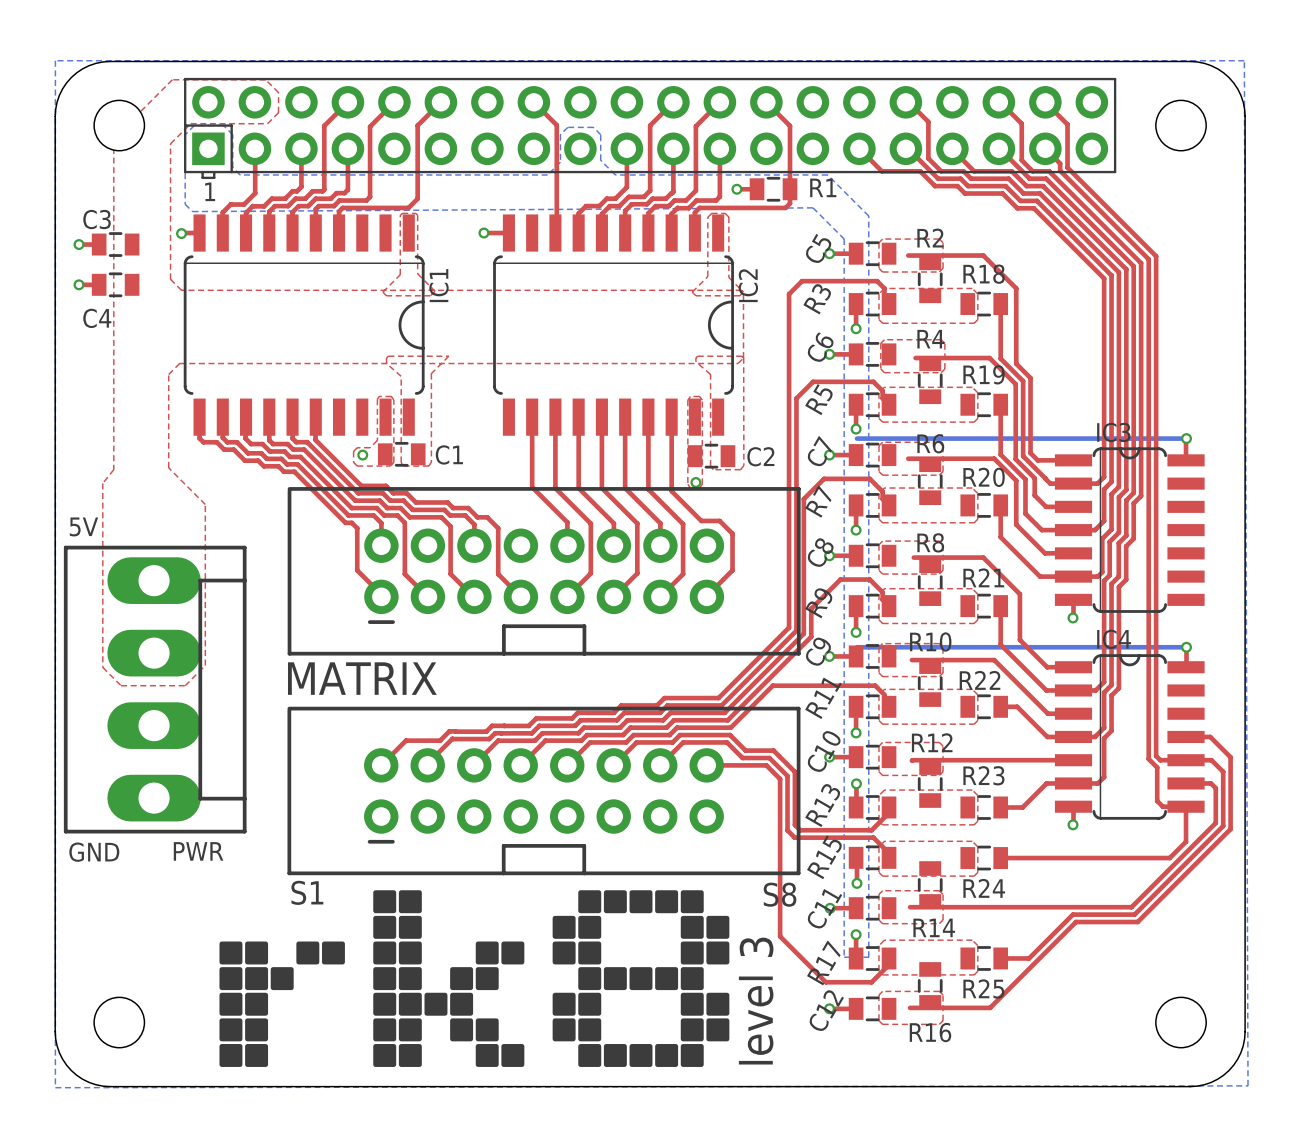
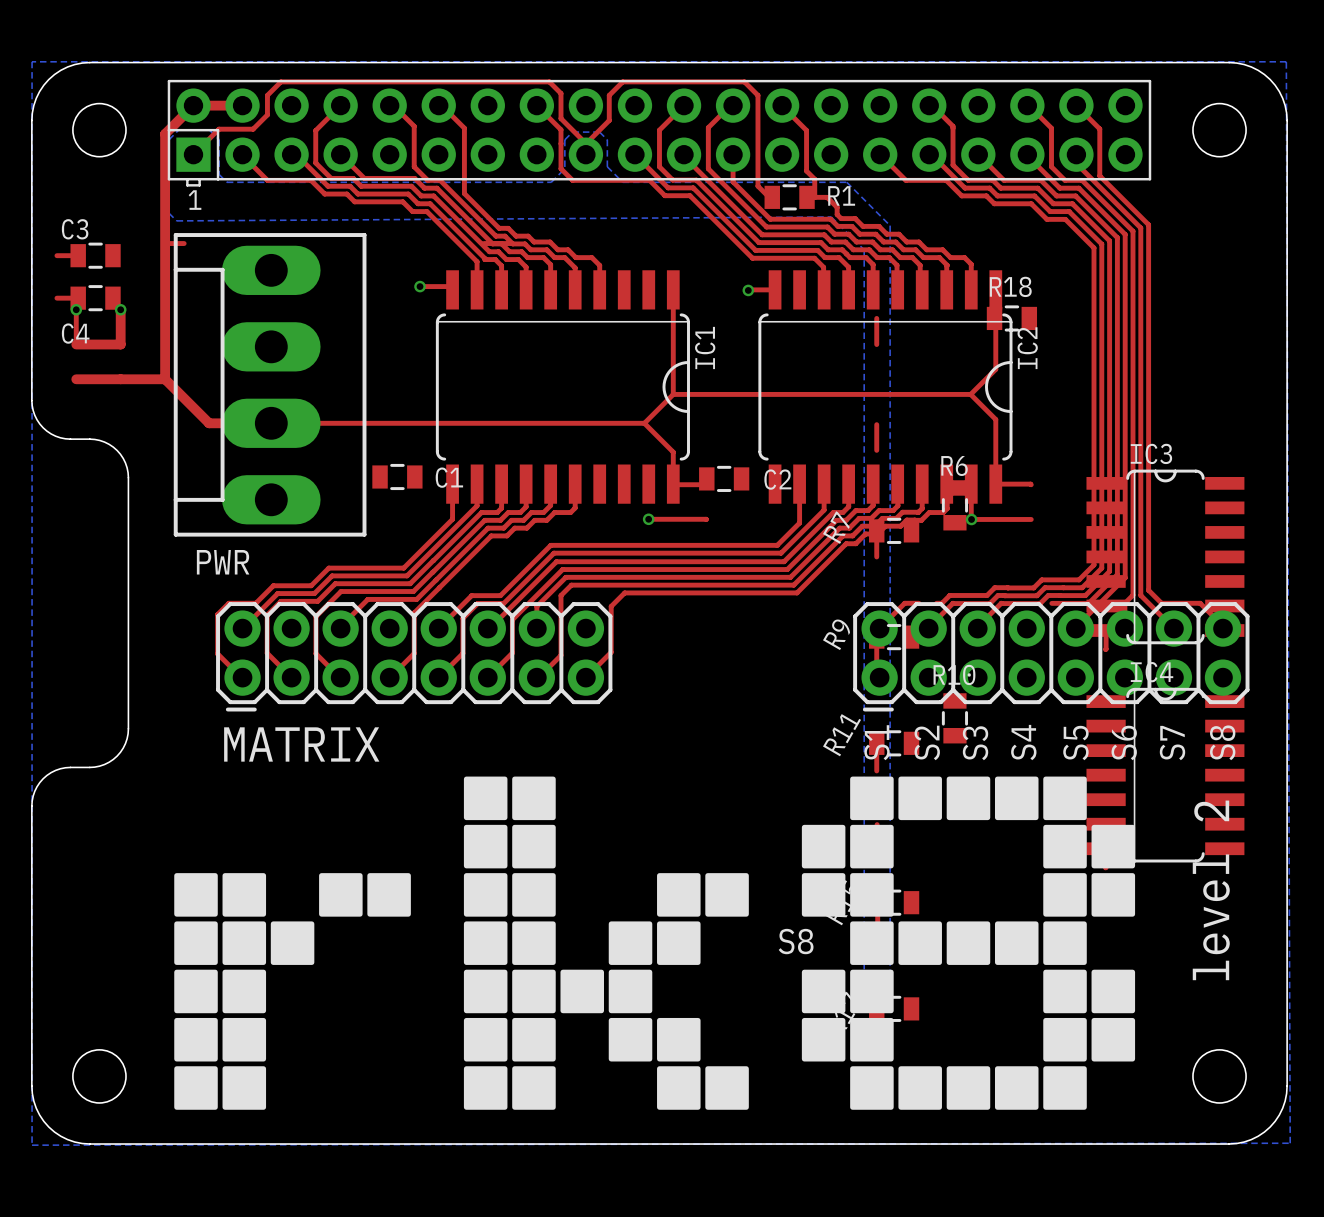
part footprint: [55, 61, 1246, 1087] -> [31, 62, 1288, 1145]
top zone outline: (172, 79) (265, 79) (278, 92) (278, 112) (267, 123) (190, 123) (170, 143) (170, 279) (181, 290) (741, 290) (741, 293) (739, 295) (695, 295) (692, 292) (707, 276) (707, 217) (711, 213) (725, 213) (728, 217) (728, 277) (743, 292) (743, 358) (738, 363) (179, 363) (168, 374) (168, 467) (205, 504) (205, 665) (185, 685) (121, 685) (102, 667) (102, 483) (113, 469) (113, 138) (172, 79) -> none
top track: none -> (242, 105) (193, 105) (165, 134) (165, 379)
top track: (394, 102) (370, 126) (370, 196) (366, 200) (339, 200) (333, 206) (318, 206) (315, 209) (315, 233) -> none
top track: (440, 102) (417, 125) -> (389, 105) (393, 105) (414, 126) (414, 130)
top track: none -> (438, 105) (441, 105) (464, 128) (464, 193) (499, 228) (508, 228) (516, 236) (528, 236) (534, 242) (550, 242) (557, 249) (568, 249) (575, 257) (591, 257) (599, 265) (599, 289)
top track: (719, 102) (695, 126) (695, 190) (686, 200) (674, 200) (668, 206) (655, 206) (648, 213) (648, 233) -> (733, 105) (730, 105) (708, 127) (708, 168) (766, 227) (827, 227) (834, 234) (848, 234) (856, 242) (872, 242) (880, 249) (892, 249) (900, 257) (912, 257) (920, 265) (920, 287) (922, 289)
top track: (766, 102) (790, 125) (790, 203) (785, 207) (699, 207) (694, 212) (694, 233) -> (782, 106) (806, 130) (806, 171) (814, 179) (814, 197) (827, 197) (837, 207) (837, 214) (841, 218) (855, 218) (863, 226) (879, 226) (886, 234) (898, 234) (906, 242) (918, 242) (926, 249) (942, 249) (950, 257) (964, 257) (971, 264) (971, 289)
top track: none -> (585, 143) (560, 118) (560, 93) (549, 81) (280, 81) (267, 95) (267, 114) (253, 129) (218, 129) (193, 154)
top track: (254, 148) (255, 193) (244, 204) (230, 204) (222, 212) (222, 233) -> (242, 154) (267, 180) (311, 180) (324, 194) (346, 194) (354, 201) (402, 201) (412, 211) (426, 211) (477, 261) (477, 289)
top track: (301, 148) (301, 186) (296, 191) (292, 191) (285, 198) (271, 198) (264, 206) (252, 206) (246, 212) (246, 233) -> (291, 154) (296, 154) (327, 186) (350, 186) (357, 194) (408, 194) (418, 203) (430, 203) (484, 259) (495, 259) (501, 265) (501, 289)
top track: (347, 148) (347, 189) (344, 193) (336, 193) (330, 198) (315, 198) (308, 206) (298, 206) (292, 212) (292, 233) -> (340, 154) (364, 178) (414, 178) (424, 188) (436, 188) (492, 243) (501, 243) (509, 251) (521, 251) (527, 257) (543, 257) (550, 264) (550, 289)
top track: (626, 148) (626, 187) (615, 198) (606, 198) (599, 206) (586, 206) (578, 213) (578, 233) -> (634, 154) (668, 187) (693, 187) (755, 250) (817, 250) (825, 257) (839, 257) (848, 267) (848, 289)
top track: (908, 148) (938, 178) (960, 178) (968, 186) (1005, 186) (1020, 200) (1036, 200) (1111, 275) (1111, 481) (1104, 489) (1104, 520) (1094, 530) (1041, 530) (1025, 513) (1025, 479) (1000, 454) (1000, 404) -> (931, 154) (964, 188) (989, 188) (997, 195) (1034, 195) (1050, 211) (1069, 211) (1101, 244) (1101, 568) (1082, 587) (1063, 587)
top track: (952, 148) (974, 171) (1011, 171) (1026, 186) (1043, 186) (1126, 269) (1126, 489) (1118, 497) (1118, 532) (1109, 541) (1109, 575) (1104, 580) (1104, 682) (1095, 690) (1046, 690) (1000, 644) (1000, 606) -> (978, 154) (1004, 180) (1041, 180) (1056, 195) (1075, 195) (1117, 237) (1117, 574) (1088, 603) (1051, 603)
top track: (998, 148) (1029, 178) (1046, 178) (1133, 266) (1133, 492) (1126, 500) (1126, 535) (1118, 543) (1118, 576) (1111, 583) (1111, 685) (1104, 692) (1104, 727) (1094, 736) (1047, 736) (1017, 706) (1000, 706) -> (1027, 154) (1059, 188) (1078, 188) (1125, 234) (1125, 577) (1075, 628)
top track: (1045, 148) (1060, 163) (1060, 170) (1148, 259) (1148, 759) (1157, 767) (1157, 801) (1162, 806) (1186, 806) (1186, 841) (1169, 858) (1000, 858) -> (1076, 154) (1076, 163) (1140, 228) (1140, 595) (1173, 628)
top track: (673, 150) (673, 192) (665, 198) (652, 198) (647, 204) (631, 204) (625, 210) (625, 233) -> (684, 156) (762, 234) (824, 234) (831, 242) (845, 242) (853, 249) (869, 249) (877, 257) (889, 257) (897, 265) (897, 289)
top track: (324, 156) (324, 189) (312, 191) (305, 198) (295, 198) (288, 206) (274, 206) (269, 211) (269, 233) -> (315, 162) (331, 178) (353, 178) (361, 186) (411, 186) (421, 195) (433, 195) (489, 251) (498, 251) (506, 259) (518, 259) (526, 267) (526, 289)
top track: (928, 158) (941, 171) (963, 171) (971, 178) (1008, 178) (1023, 193) (1040, 193) (1118, 272) (1118, 486) (1111, 494) (1111, 529) (1102, 538) (1102, 572) (1097, 576) (1040, 576) (1000, 537) (1000, 505) -> (953, 165) (968, 180) (992, 180) (1000, 188) (1037, 188) (1053, 203) (1072, 203) (1109, 240) (1109, 571) (1085, 595) (1048, 595) (1040, 603) (1001, 603) (977, 628)
top track: (417, 160) (417, 198) (408, 207) (342, 207) (339, 211) (339, 233) -> (414, 166) (427, 180) (440, 180) (495, 236) (505, 236) (512, 243) (524, 243) (530, 249) (546, 249) (554, 257) (564, 257) (575, 267) (575, 289)
top track: (650, 160) (650, 190) (643, 196) (628, 196) (619, 206) (609, 206) (601, 214) (601, 233) -> (659, 166) (672, 180) (696, 180) (758, 242) (821, 242) (828, 249) (842, 249) (850, 257) (866, 257) (873, 264) (873, 289)
top track: (556, 162) (555, 233) -> (560, 168) (572, 180) (649, 180) (664, 195) (689, 195) (752, 258) (814, 258) (823, 267) (824, 289)
top track: (1067, 167) (1156, 256) (1156, 756) (1160, 760) (1211, 760) (1223, 771) (1223, 826) (1134, 914) (1072, 914) (1029, 958) (1000, 958) -> (1099, 174) (1148, 224) (1148, 590) (1161, 603) (1200, 603) (1222, 626) (1222, 628)
top track: (881, 171) (920, 171) (935, 186) (957, 186) (964, 193) (1002, 193) (1017, 208) (1033, 208) (1104, 278) (1104, 477) (1097, 483) (1050, 483) (1045, 479) -> (903, 178) (905, 180) (946, 180) (961, 195) (986, 195) (994, 203) (1031, 203) (1046, 219) (1065, 219) (1093, 247) (1093, 564) (1079, 579) (1041, 579) (1033, 587) (994, 587) (987, 595) (949, 595) (941, 603) (936, 603)
top track: (1032, 171) (1049, 171) (1141, 263) (1141, 496) (1133, 503) (1133, 538) (1126, 546) (1126, 579) (1118, 586) (1118, 688) (1111, 695) (1111, 730) (1104, 738) (1104, 777) (1097, 783) (1046, 783) (1022, 807) (1000, 807) -> (1063, 178) (1065, 180) (1082, 180) (1133, 231) (1133, 595) (1124, 603) (1124, 628)
top track: (719, 174) (719, 196) (716, 200) (696, 200) (688, 208) (677, 207) (671, 213) (671, 233) -> (733, 181) (770, 219) (830, 219) (837, 226) (852, 226) (859, 234) (875, 234) (883, 242) (895, 242) (903, 249) (915, 249) (923, 257) (939, 257) (947, 265) (946, 289)
top track: (736, 189) (754, 189) -> (585, 154) (585, 141) (588, 141) (609, 120) (609, 95) (622, 81) (744, 81) (757, 95) (757, 186) (769, 197)
via: (736, 189) -> none
top zone outline: (402, 213) (415, 213) (417, 215) (417, 273) (435, 291) (430, 295) (386, 295) (382, 292) (400, 274) (400, 215) (402, 213) -> none
via: (181, 233) -> none
via position: (483, 233) -> (420, 286)
top zone outline: (882, 239) (939, 239) (943, 242) (943, 268) (939, 272) (882, 272) (878, 268) (878, 242) (882, 239) -> none
via: (79, 244) -> none
top track: (829, 253) (856, 253) -> none
via: (829, 253) -> none
C5: (872, 253) -> none
top track: (908, 255) (983, 255) (1016, 288) (1016, 363) (1030, 378) (1030, 453) (1037, 460) (1073, 460) -> none
top track: none -> (420, 286) (449, 286) (452, 289)
top track: none -> (673, 289) (673, 394)
top track: none -> (775, 289) (748, 290)
top track: none -> (995, 289) (995, 369) (970, 394)
via: none -> (748, 290)
R2: (930, 279) -> none
via position: (79, 284) -> (76, 309)
top zone outline: (884, 288) (972, 288) (977, 293) (977, 319) (974, 323) (882, 323) (878, 319) (878, 293) (884, 288) -> none
top track: none -> (76, 309) (76, 344) (120, 344) (120, 309)
via: none -> (120, 309)
R3: (872, 304) -> none
top track: (889, 304) (884, 299) (884, 288) (877, 281) (802, 281) (789, 294) (789, 627) (718, 698) (664, 698) (657, 705) (621, 705) (613, 712) (577, 712) (572, 718) (536, 718) (528, 725) (504, 725) -> none
top track: (1000, 304) (1000, 358) (1023, 381) (1023, 456) (1045, 478) -> none
IC1 position: (304, 325) -> (562, 387)
IC2 position: (613, 325) -> (885, 387)
via: (856, 328) -> none
top zone outline: (884, 339) (941, 339) (944, 343) (944, 369) (941, 372) (884, 372) (880, 369) (880, 343) (884, 339) -> none
top track: (829, 354) (856, 354) -> none
via: (829, 354) -> none
C6: (872, 354) -> none
top zone outline: (388, 356) (386, 363) (401, 376) (401, 462) (403, 466) (428, 466) (431, 462) (431, 373) (448, 356) (388, 356) -> none
top zone outline: (697, 356) (743, 357) (743, 465) (740, 469) (713, 469) (710, 466) (710, 374) (695, 361) (697, 356) -> none
top track: (915, 358) (989, 358) (1015, 384) (1015, 459) (1034, 478) (1034, 495) (1046, 506) (1073, 506) -> none
top track: none -> (76, 379) (165, 379)
top track: none -> (165, 379) (209, 423) (644, 423)
PWR: none -> (270, 384)
top track: none -> (673, 394) (644, 423)
top track: none -> (673, 394) (970, 394)
top track: none -> (970, 394) (995, 419) (995, 484) (1031, 484)
R4: (930, 380) -> none
top zone outline: (884, 387) (972, 387) (977, 392) (977, 418) (974, 422) (882, 422) (878, 418) (878, 392) (884, 387) -> none
top zone outline: (379, 396) (391, 396) (393, 400) (393, 462) (390, 466) (357, 466) (353, 462) (353, 451) (357, 447) (370, 447) (377, 440) (377, 399) (379, 396) -> none
top zone outline: (690, 396) (699, 396) (702, 400) (702, 484) (699, 488) (690, 488) (687, 484) (687, 400) (690, 396) -> none
top track: none -> (644, 423) (673, 452) (673, 484) (706, 484)
R5: (872, 404) -> none
top track: (889, 404) (882, 398) (882, 390) (873, 381) (813, 381) (796, 398) (796, 630) (721, 705) (667, 705) (660, 712) (624, 712) (617, 720) (580, 720) (575, 725) (539, 725) (531, 733) (495, 733) (489, 739) (452, 738) (427, 765) -> none
R19: (984, 404) -> none
top track: (199, 417) (199, 438) (203, 442) (216, 442) (224, 449) (233, 449) (244, 460) (258, 460) (263, 466) (278, 466) (283, 471) (294, 471) (345, 522) (351, 522) (357, 528) (357, 570) (381, 594) (381, 596) -> none
top track: (222, 417) (222, 437) (227, 442) (236, 442) (248, 453) (261, 453) (266, 458) (281, 458) (287, 464) (297, 464) (348, 515) (373, 515) (381, 523) (381, 545) -> none
top track: (246, 417) (245, 438) (251, 444) (262, 444) (269, 451) (284, 451) (290, 456) (300, 456) (351, 508) (376, 508) (384, 515) (397, 515) (404, 522) (404, 574) (427, 596) -> none
top track: (269, 417) (269, 440) (273, 444) (287, 444) (293, 449) (304, 449) (355, 500) (379, 500) (387, 508) (400, 508) (409, 517) (441, 517) (450, 526) (450, 574) (474, 596) -> none
top track: (292, 417) (292, 438) (296, 442) (307, 442) (358, 493) (382, 493) (390, 500) (403, 500) (412, 509) (444, 509) (450, 515) (465, 515) (474, 524) (474, 545) -> none
top track: (315, 417) (315, 440) (361, 485) (385, 485) (393, 493) (406, 493) (415, 502) (447, 502) (453, 508) (468, 508) (477, 517) (487, 517) (498, 528) (498, 574) (520, 596) -> none
top track: (532, 417) (532, 487) (567, 522) (567, 545) -> none
top track: (555, 417) (555, 488) (590, 523) (590, 573) (567, 596) -> none
top track: (578, 417) (578, 488) (613, 523) (613, 545) -> none
top track: (601, 417) (601, 488) (637, 523) (637, 573) (613, 596) -> none
top track: (625, 417) (625, 488) (660, 523) (660, 545) -> none
top track: (648, 417) (648, 489) (683, 524) (683, 574) (660, 596) -> none
top track: (671, 417) (671, 491) (701, 520) (719, 520) (732, 533) (732, 570) (706, 596) -> none
via: (856, 429) -> none
bottom track: (857, 438) (1186, 438) -> none
top track: (1186, 438) (1186, 460) -> none
via: (1186, 438) -> none
top zone outline: (882, 442) (939, 442) (943, 445) (943, 471) (939, 475) (882, 475) (878, 471) (878, 445) (882, 442) -> none
via: (362, 455) -> none
top track: (829, 455) (856, 455) -> none
via: (829, 455) -> none
C7: (872, 455) -> none
top track: (908, 458) (994, 458) (1016, 480) (1016, 524) (1045, 553) (1073, 553) -> none
top track: none -> (452, 484) (452, 519) (403, 568) (328, 568) (311, 585) (273, 585) (255, 603) (228, 603) (217, 614) (217, 653) (242, 677)
top track: none -> (477, 484) (477, 505) (406, 575) (332, 575) (314, 593) (277, 593) (242, 628)
top track: none -> (501, 484) (501, 508) (497, 512) (481, 512) (410, 583) (335, 583) (317, 601) (280, 601) (267, 615) (267, 653) (291, 677)
top track: none -> (526, 484) (526, 506) (520, 512) (508, 512) (500, 520) (484, 520) (432, 572)
top track: none -> (550, 484) (550, 505) (543, 512) (531, 512) (523, 520) (511, 520) (503, 528) (488, 528) (416, 599) (367, 599) (340, 628)
top track: none -> (575, 484) (575, 507) (570, 512) (554, 512) (546, 520) (534, 520) (526, 528) (514, 528) (506, 535) (491, 535) (414, 612) (414, 653) (390, 677)
top track: none -> (799, 484) (799, 523) (777, 545) (550, 545) (500, 595) (471, 595) (438, 628)
top track: none -> (824, 484) (824, 510) (781, 553) (554, 553) (503, 603) (477, 603) (462, 618) (462, 653) (438, 677)
top track: none -> (873, 484) (873, 505) (868, 510) (855, 510) (846, 520) (836, 520) (787, 569) (562, 569) (512, 619) (512, 653) (487, 677)
top track: none -> (897, 484) (897, 505) (893, 510) (879, 510) (871, 518) (859, 518) (849, 528) (839, 528) (790, 577) (565, 577) (536, 606) (536, 628)
top track: none -> (922, 484) (922, 508) (918, 512) (902, 512) (896, 518) (882, 518) (874, 526) (862, 526) (852, 535) (842, 535) (793, 585) (571, 585) (560, 595) (560, 655) (536, 677)
top track: none -> (946, 484) (947, 508) (943, 512) (929, 512) (921, 520) (906, 520) (900, 526) (885, 526) (877, 534) (865, 534) (855, 543) (846, 543) (797, 592) (624, 592) (611, 606) (611, 652) (585, 677)
top track: none -> (971, 484) (971, 519) (1031, 519)
via position: (695, 482) -> (648, 519)
top track: (814, 488) (824, 478) (869, 478) (882, 491) (882, 499) (889, 505) -> (833, 512) (842, 512) (848, 506) (848, 484)
top zone outline: (884, 488) (972, 488) (977, 493) (977, 519) (974, 522) (882, 522) (878, 519) (878, 493) (884, 488) -> none
top track: none -> (648, 519) (706, 519)
via: none -> (971, 519)
top track: (803, 499) (803, 633) (724, 712) (670, 712) (663, 720) (627, 720) (620, 727) (584, 727) (578, 733) (542, 733) (534, 740) (498, 740) -> (821, 524) (784, 561) (556, 561) (487, 628)
R20: (984, 505) -> none
via: (856, 530) -> none
top zone outline: (882, 541) (939, 541) (943, 544) (943, 570) (939, 574) (882, 574) (878, 570) (878, 544) (882, 541) -> none
top track: none -> (432, 572) (413, 591) (341, 591) (315, 616) (315, 653) (340, 677)
top track: (829, 555) (856, 555) -> none
via: (829, 555) -> none
C8: (872, 555) -> none
top track: (913, 557) (983, 557) (1019, 594) (1019, 639) (1047, 667) (1073, 667) -> none
top track: none -> (1063, 587) (1045, 587) (1036, 595) (998, 595) (989, 603) (953, 603) (928, 628)
part: (544, 571) -> none
top track: none -> (918, 603) (904, 603) (879, 628)
R8: (930, 582) -> none
top zone outline: (884, 588) (972, 588) (977, 594) (977, 619) (974, 623) (882, 623) (878, 619) (878, 594) (884, 588) -> none
top track: (889, 606) (882, 599) (882, 592) (869, 579) (840, 579) (811, 608) (811, 636) (727, 720) (673, 720) (666, 727) (630, 727) (623, 735) (587, 735) (581, 740) (545, 740) (520, 765) -> none
R21: (984, 606) -> none
via: (1073, 617) -> none
part: none -> (414, 656)
part: none -> (1051, 656)
via: (856, 632) -> none
top zone outline: (882, 643) (939, 643) (943, 647) (943, 672) (939, 676) (882, 676) (878, 672) (878, 647) (882, 643) -> none
bottom track: (857, 647) (1186, 647) -> none
via: (1186, 647) -> none
top track: (829, 656) (856, 656) -> none
via: (829, 656) -> none
C9: (872, 656) -> none
top track: (911, 660) (994, 660) (1047, 713) (1073, 713) -> none
text position: MATRIX (362, 678) -> MATRIX (301, 744)
PWR: 5V (155, 689) -> none
top zone outline: (884, 689) (972, 689) (977, 694) (977, 720) (974, 724) (882, 724) (878, 720) (878, 694) (884, 689) -> none
text: none -> S4 (1023, 742)
text: none -> S6 (1124, 742)
text: none -> S8 (1222, 742)
text: none -> S1 (877, 742)
top track: (889, 706) (884, 702) (884, 694) (875, 685) (772, 685) (730, 727) (677, 727) (669, 735) (633, 735) (626, 742) (590, 742) (567, 765) -> none
text: none -> S2 (927, 742)
text: none -> S3 (975, 743)
R22: (984, 706) -> none
text: none -> S5 (1075, 743)
text: none -> S7 (1172, 743)
top track: (504, 725) (492, 725) (486, 731) (449, 731) (440, 740) (406, 740) (381, 765) -> none
via: (856, 732) -> none
top track: (1186, 736) (1210, 736) (1230, 757) (1230, 829) (1137, 922) (1076, 922) (990, 1007) (910, 1007) -> none
drawing: none -> [463, 776, 701, 1110]
drawing: none -> [801, 776, 1136, 1110]
top track: (498, 740) (474, 765) -> none
top zone outline: (882, 742) (939, 742) (943, 746) (943, 771) (939, 775) (882, 775) (878, 771) (878, 746) (882, 742) -> none
top track: (829, 757) (856, 757) -> none
via: (829, 757) -> none
C10: (872, 757) -> none
top track: (1073, 760) (911, 760) -> none
top track: (613, 765) (636, 742) (672, 742) (680, 735) (730, 735) (745, 750) (773, 750) (794, 771) (794, 824) (800, 830) (871, 830) (889, 812) (889, 807) -> none
top track: (660, 765) (683, 742) (727, 742) (742, 758) (769, 758) (787, 776) (787, 830) (794, 837) (873, 837) (889, 853) (889, 857) -> none
top track: (706, 765) (766, 765) (780, 779) (780, 936) (825, 982) (871, 982) (889, 964) (889, 958) -> none
via: (856, 783) -> none
top track: (1186, 783) (1211, 783) (1215, 788) (1215, 823) (1131, 907) (910, 907) -> none
R12: (930, 784) -> none
part: (543, 790) -> none
top zone outline: (884, 790) (972, 790) (977, 795) (977, 821) (974, 824) (882, 824) (878, 821) (878, 795) (884, 790) -> none
R13: (872, 807) -> none
R23: (984, 807) -> none
via: (1073, 824) -> none
drawing: none -> [174, 873, 411, 1110]
drawing: none -> [657, 873, 749, 917]
top zone outline: (884, 841) (972, 841) (977, 846) (977, 872) (974, 876) (882, 876) (878, 872) (878, 846) (884, 841) -> none
text: GND (94, 852) -> none
R24: (984, 858) -> none
text: none -> level 2 (1211, 890)
via: (857, 883) -> none
R14: (930, 884) -> none
drawing: [373, 890, 525, 1067] -> none
drawing: [552, 890, 730, 1067] -> none
drawing shape: [603, 890, 627, 914] -> [608, 921, 653, 965]
drawing: [629, 890, 653, 914] -> none
drawing shape: [655, 890, 679, 914] -> [657, 921, 701, 965]
top zone outline: (882, 890) (939, 890) (943, 894) (943, 920) (939, 923) (882, 923) (878, 920) (878, 894) (882, 890) -> none
text: S1 (307, 892) -> none
top track: (830, 908) (856, 908) -> none
via: (830, 908) -> none
C11: (872, 908) -> none
via: (856, 934) -> none
top zone outline: (884, 940) (972, 940) (977, 945) (977, 971) (974, 974) (882, 974) (878, 971) (878, 945) (884, 940) -> none
drawing: [219, 941, 345, 1067] -> none
drawing shape: [245, 941, 269, 965] -> [222, 969, 267, 1014]
drawing shape: [475, 941, 499, 965] -> [463, 969, 508, 1014]
drawing: [501, 941, 525, 965] -> none
R25: (984, 958) -> none
drawing shape: [475, 967, 499, 991] -> [463, 1017, 508, 1062]
drawing shape: [655, 967, 679, 991] -> [657, 1017, 701, 1062]
R16: (930, 985) -> none
top zone outline: (882, 991) (939, 991) (943, 995) (943, 1020) (939, 1024) (882, 1024) (878, 1020) (878, 995) (882, 991) -> none
text: level 3 (756, 1001) -> none
top track: (829, 1008) (856, 1008) -> none
via: (829, 1008) -> none
C12: (872, 1008) -> none
drawing shape: [245, 1018, 269, 1042] -> [222, 1066, 267, 1110]
drawing shape: [475, 1018, 499, 1042] -> [463, 1066, 508, 1110]
drawing shape: [706, 1018, 730, 1042] -> [705, 1066, 749, 1110]

